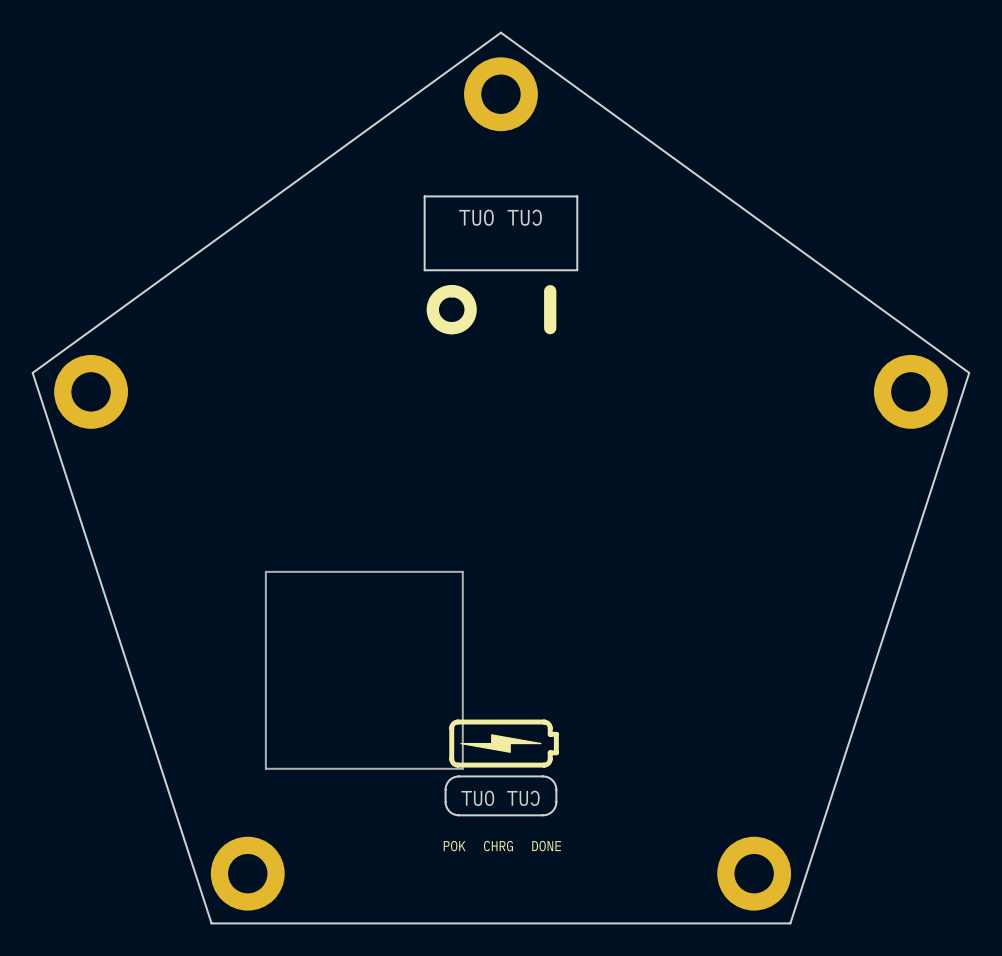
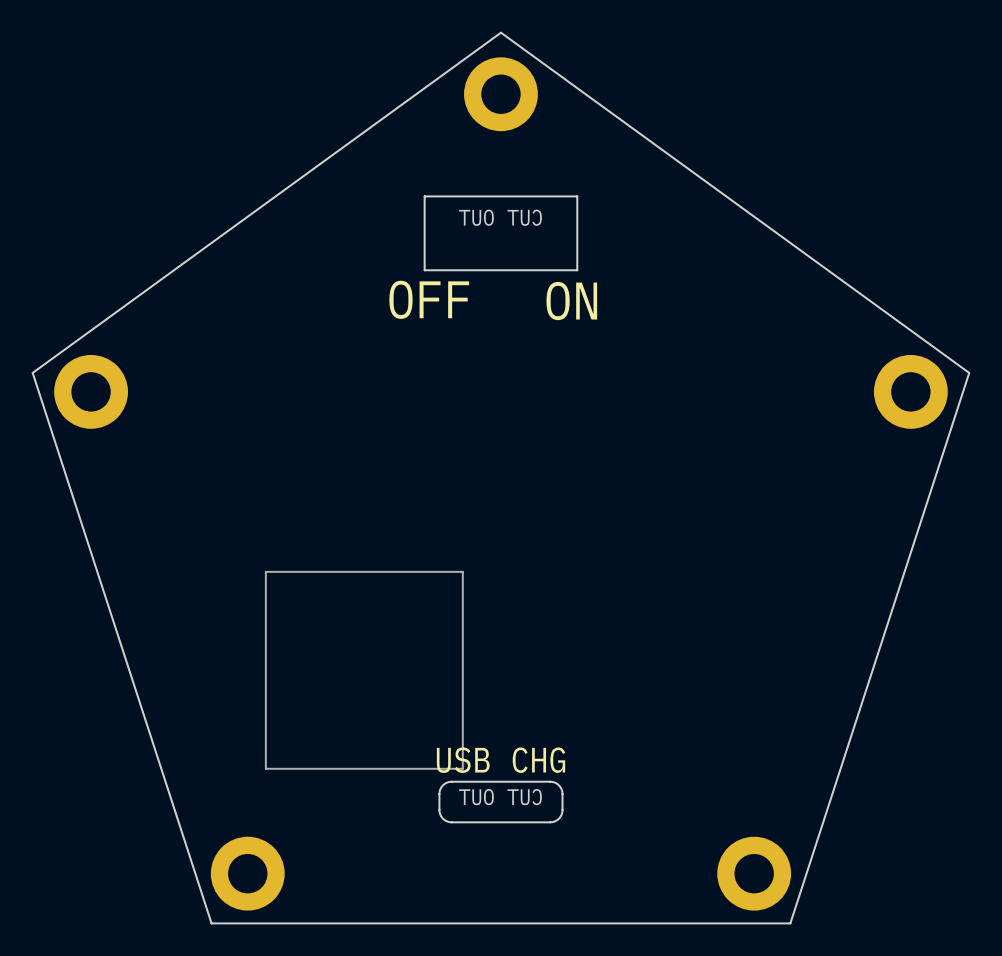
line: (451, 291) (438, 296) (432, 309) (437, 322) (450, 328) (463, 323) (470, 311) (466, 297) (458, 292) (451, 291) -> none
line: (550, 291) (550, 328) -> none
text: none -> OFF (429, 299)
text: none -> ON (571, 301)
line: (457, 722) (545, 722) (549, 725) (550, 734) (556, 734) (556, 752) (550, 752) (549, 761) (544, 765) (456, 764) (451, 759) (451, 728) (453, 723) (457, 722) -> none
drawing: [460, 734, 542, 753] -> none
text: none -> USB CHG (501, 760)
part footprint: [445, 776, 557, 816] -> [439, 781, 563, 823]
POK: (454, 846) -> none
CHRG: (498, 846) -> none
DONE: (546, 846) -> none

